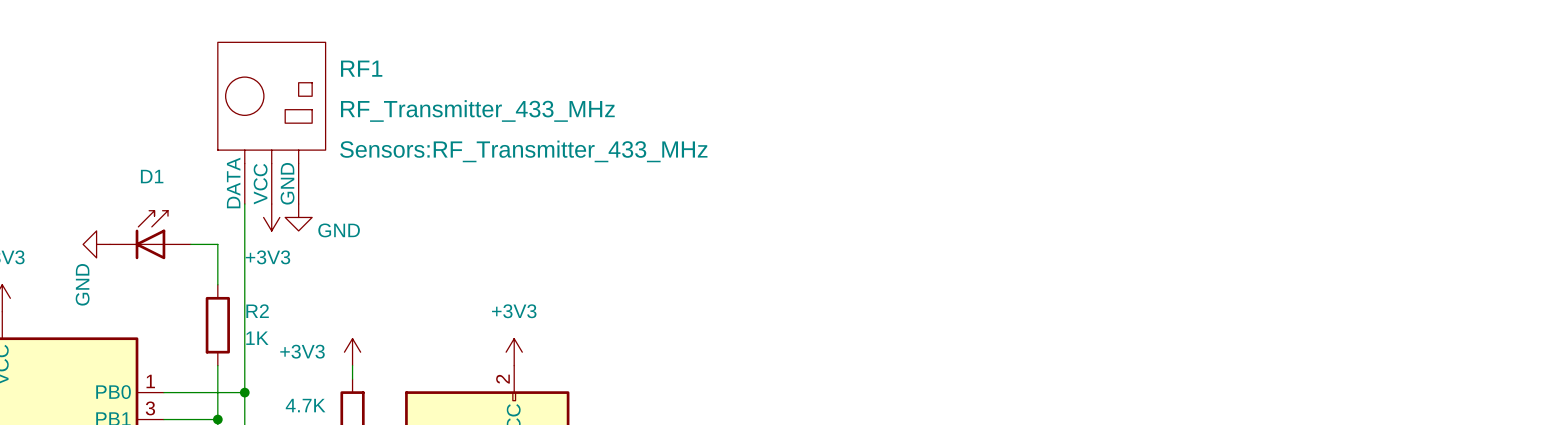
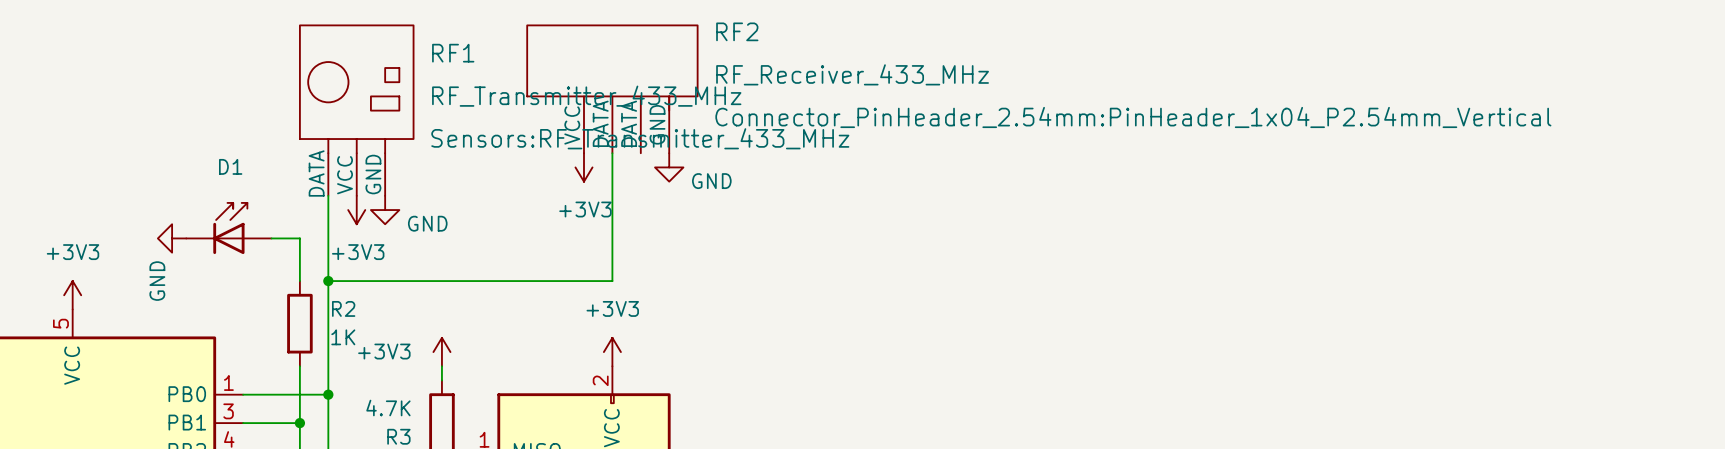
RF2: none -> RF_Receiver_433_MHz (612, 89)
wire: none -> (612, 153) (612, 281) (328, 281)
power symbol: none -> +3V3 (584, 167)
power symbol: none -> GND (669, 167)
junction: none -> (328, 281)

